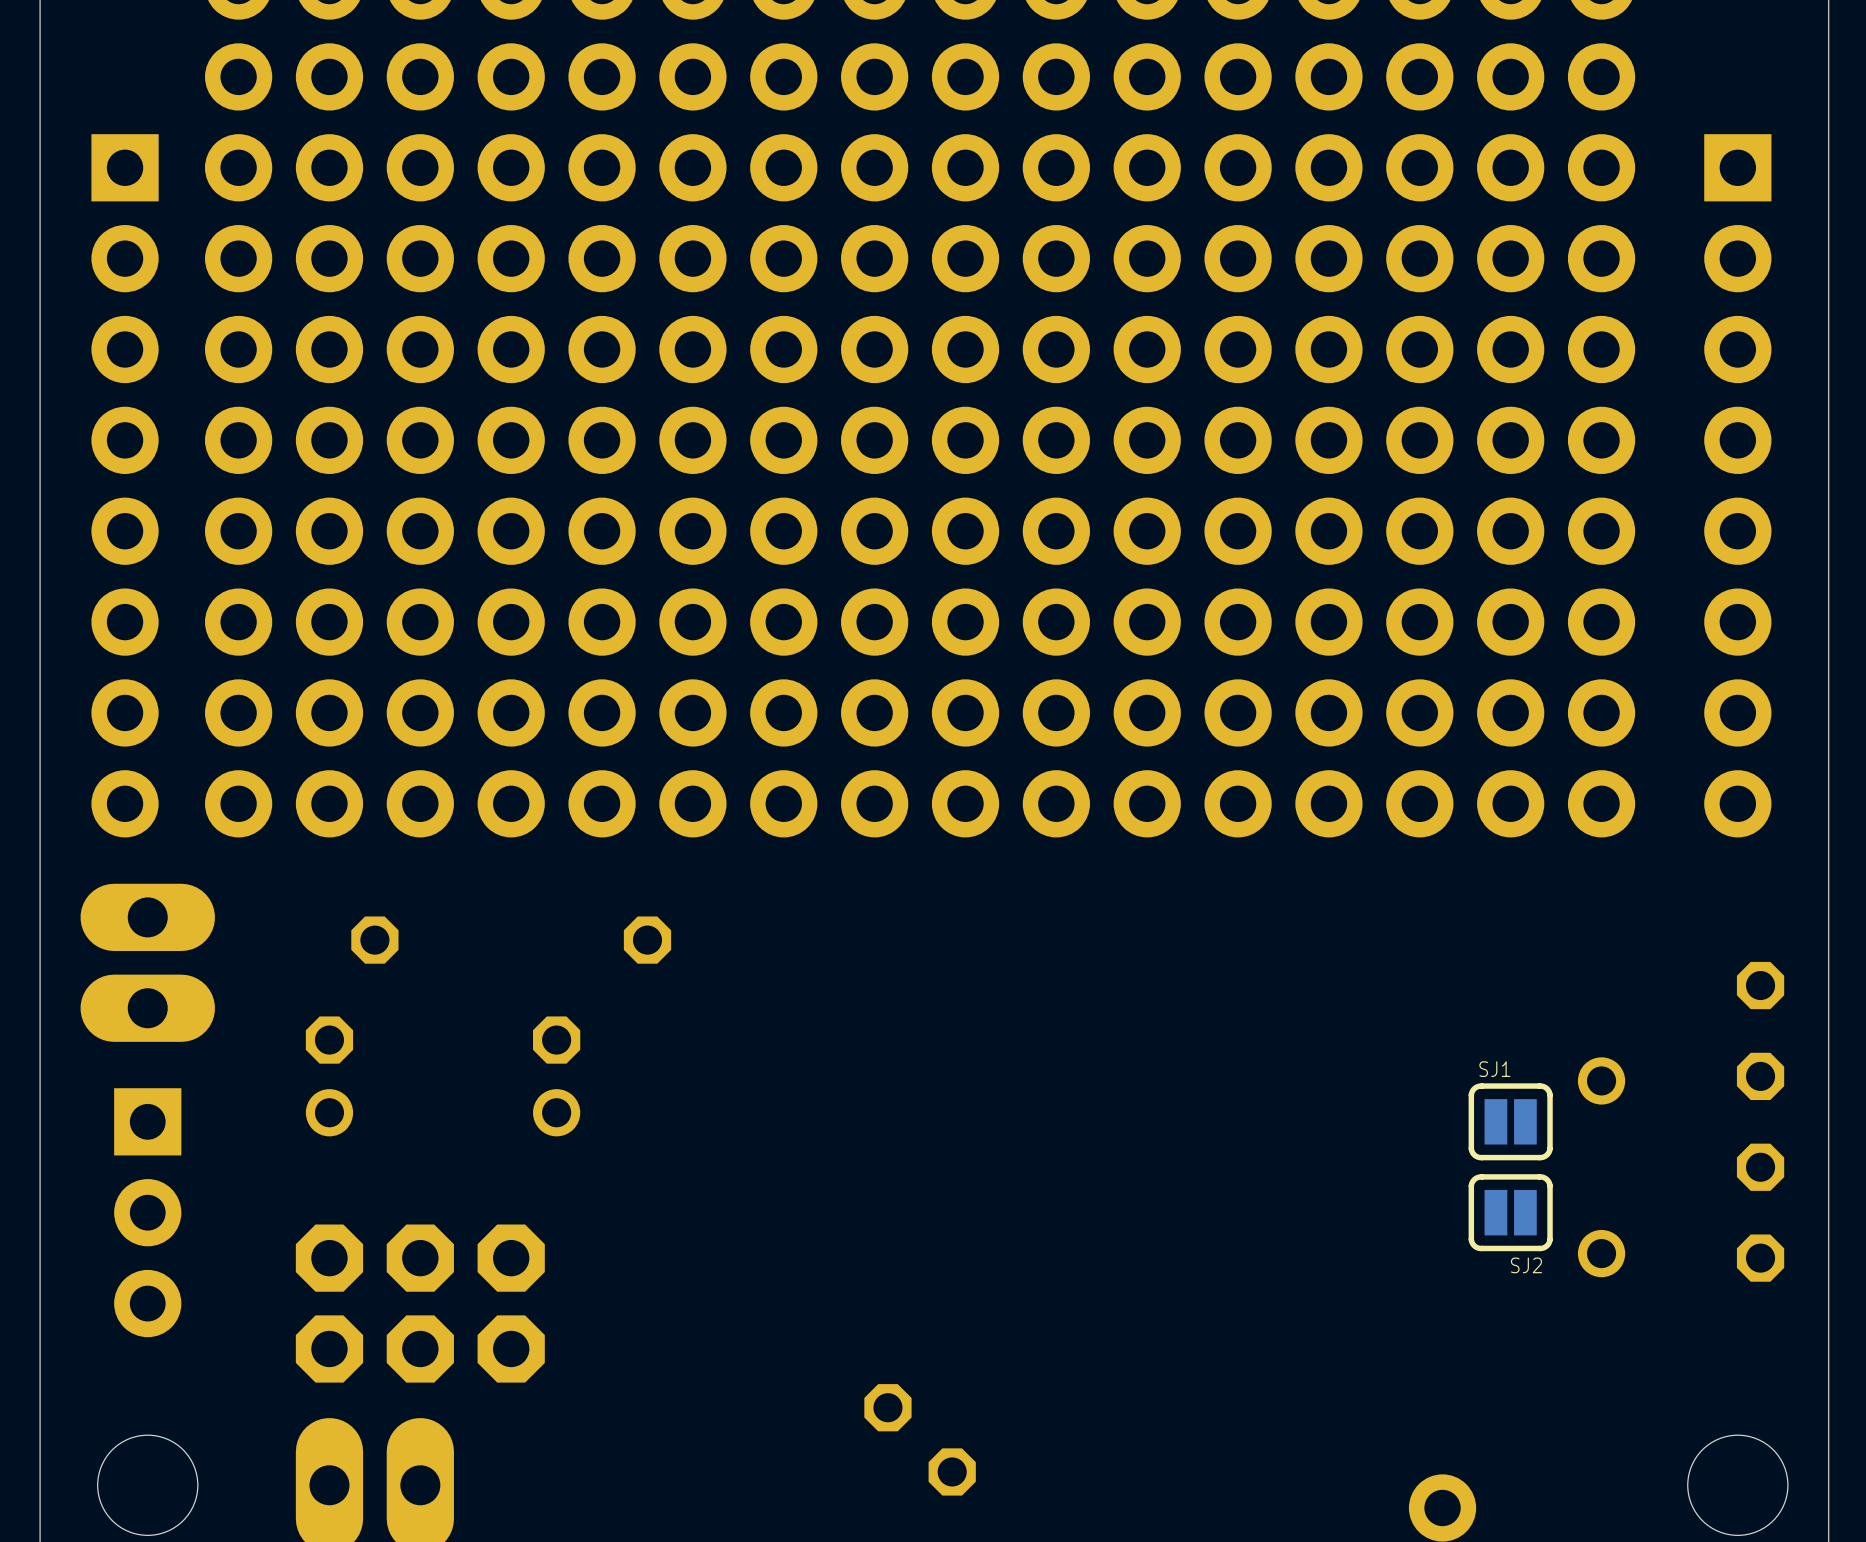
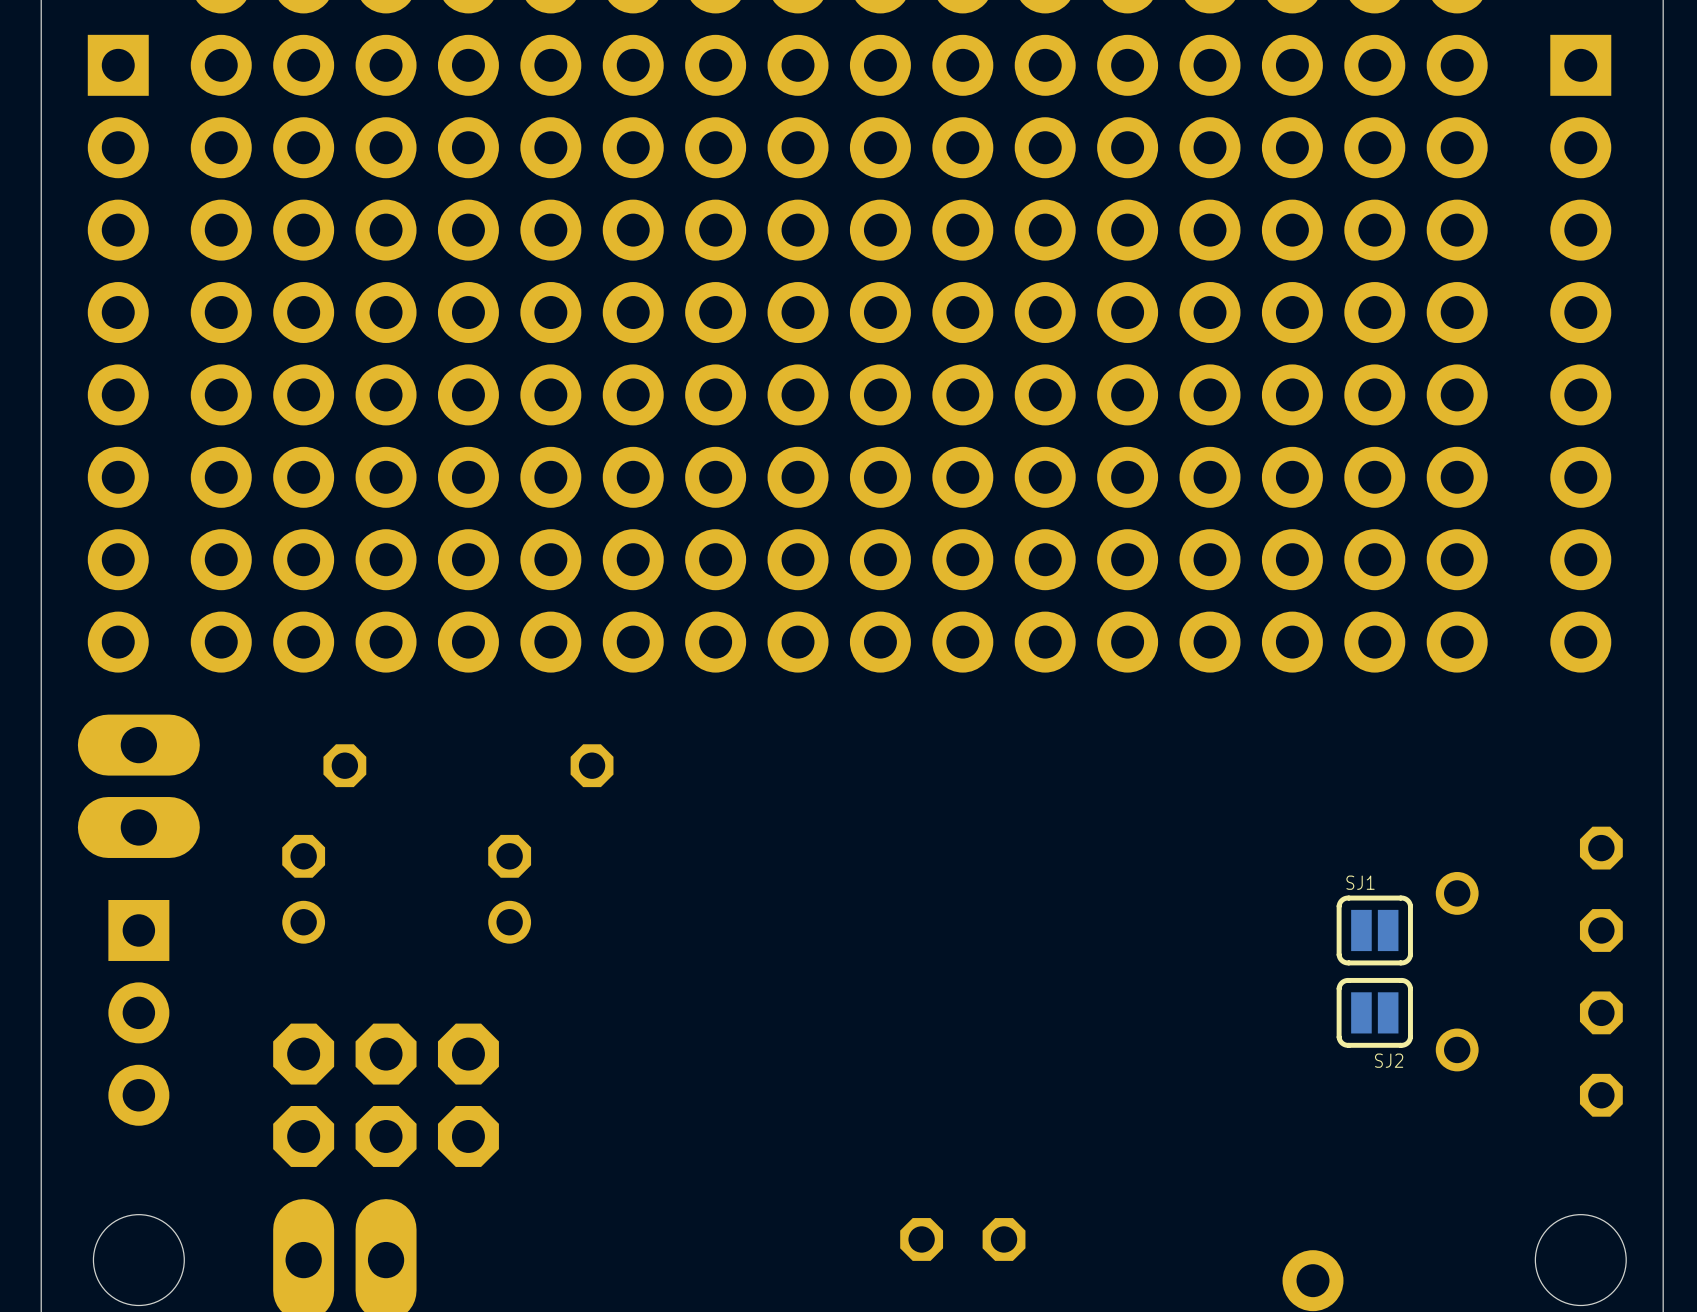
part position: (1760, 1030) -> (1601, 889)
part position: (1760, 1212) -> (1601, 1054)
part: (920, 1439) -> none
part: none -> (962, 1239)

